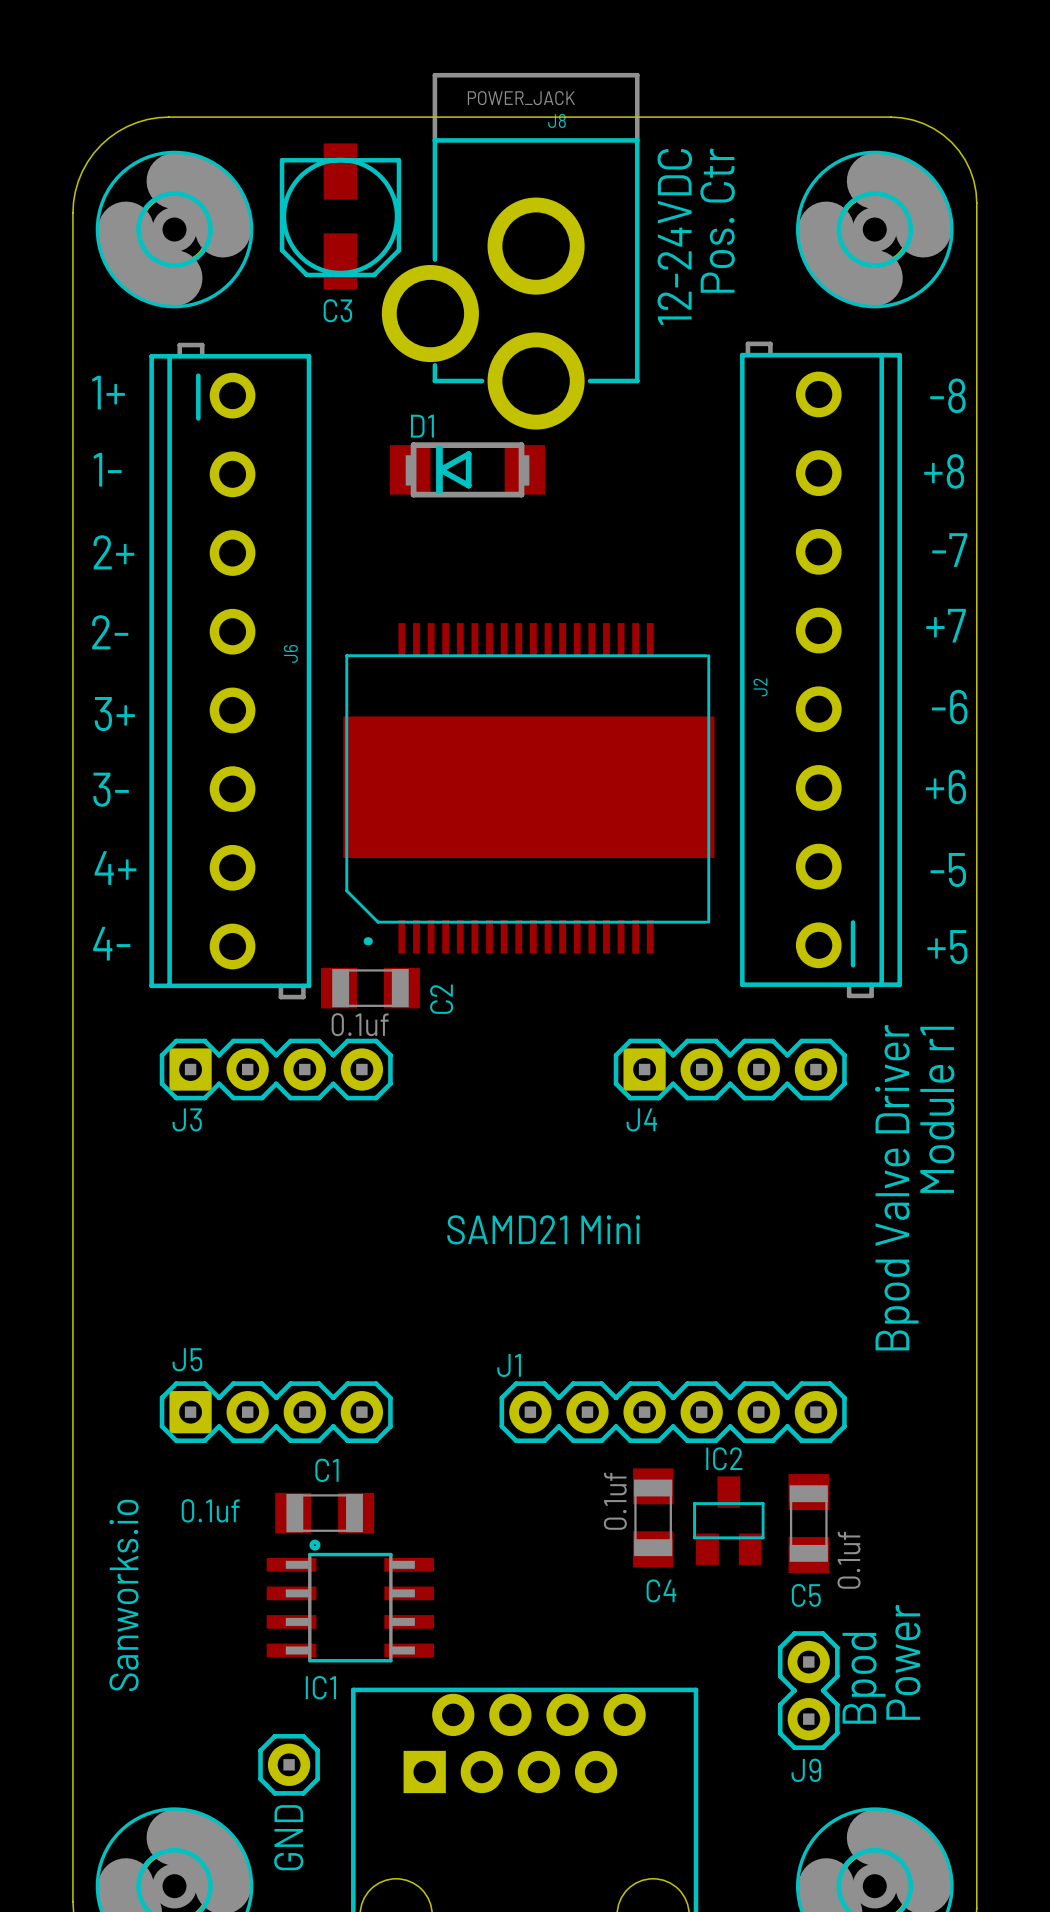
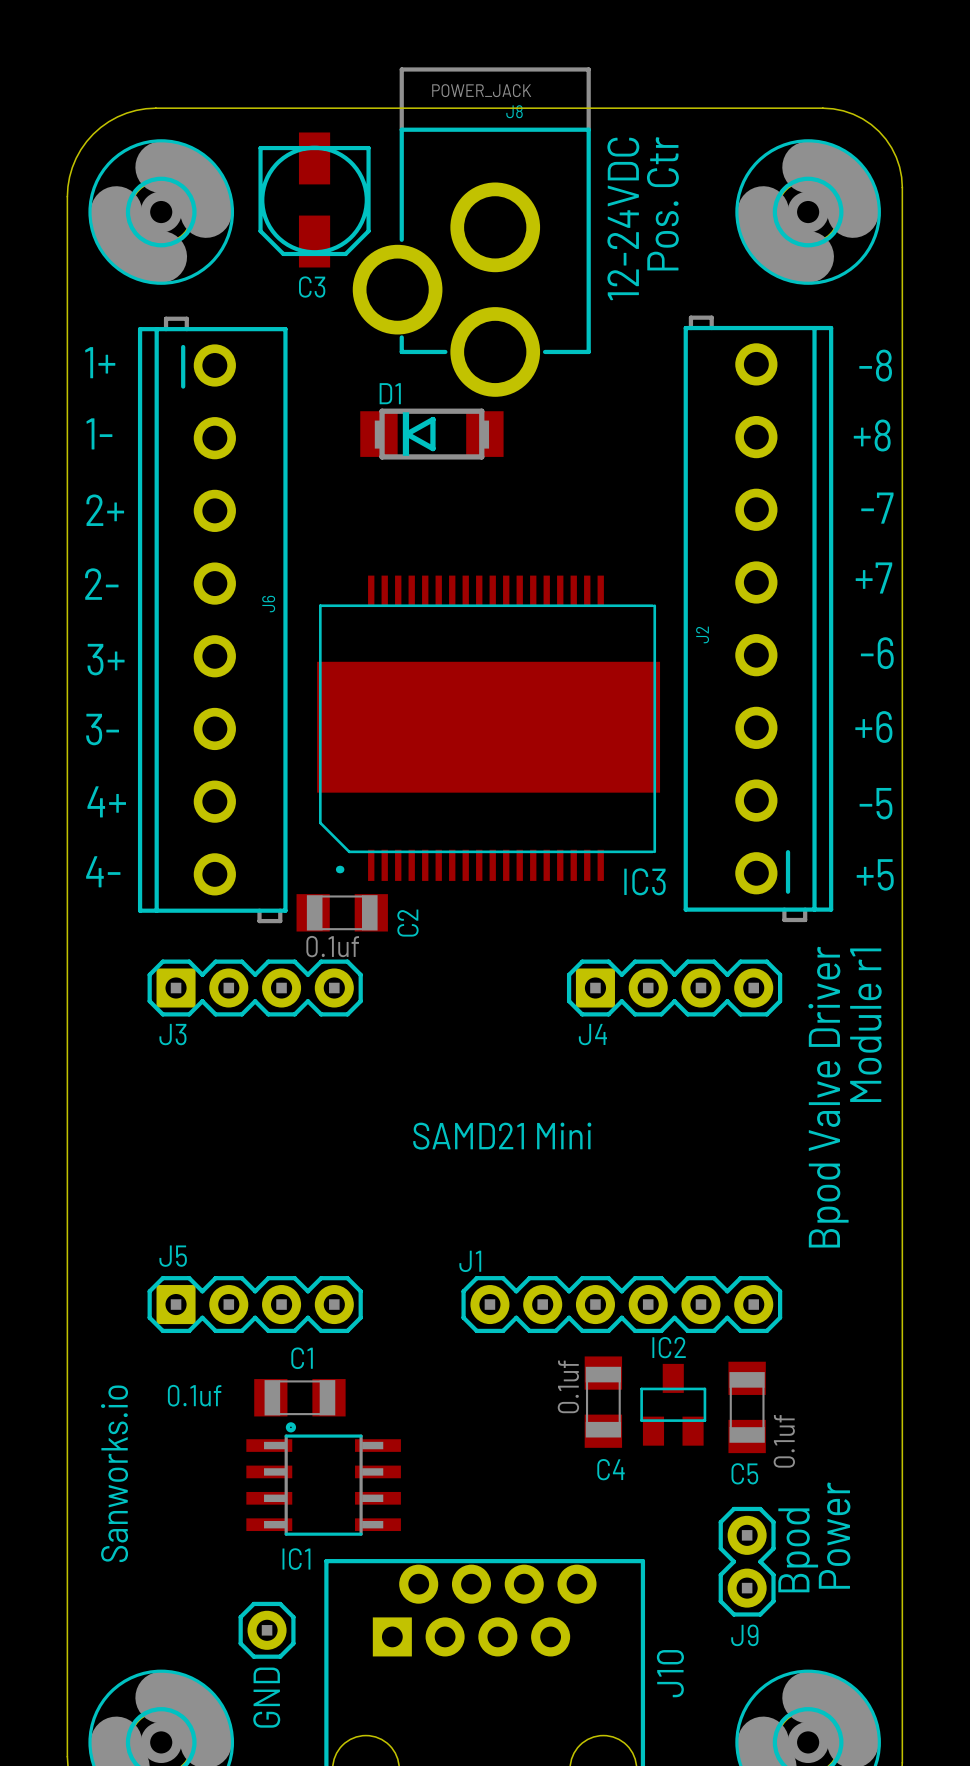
text: none -> IC3 (645, 881)
text: none -> J10 (670, 1673)

